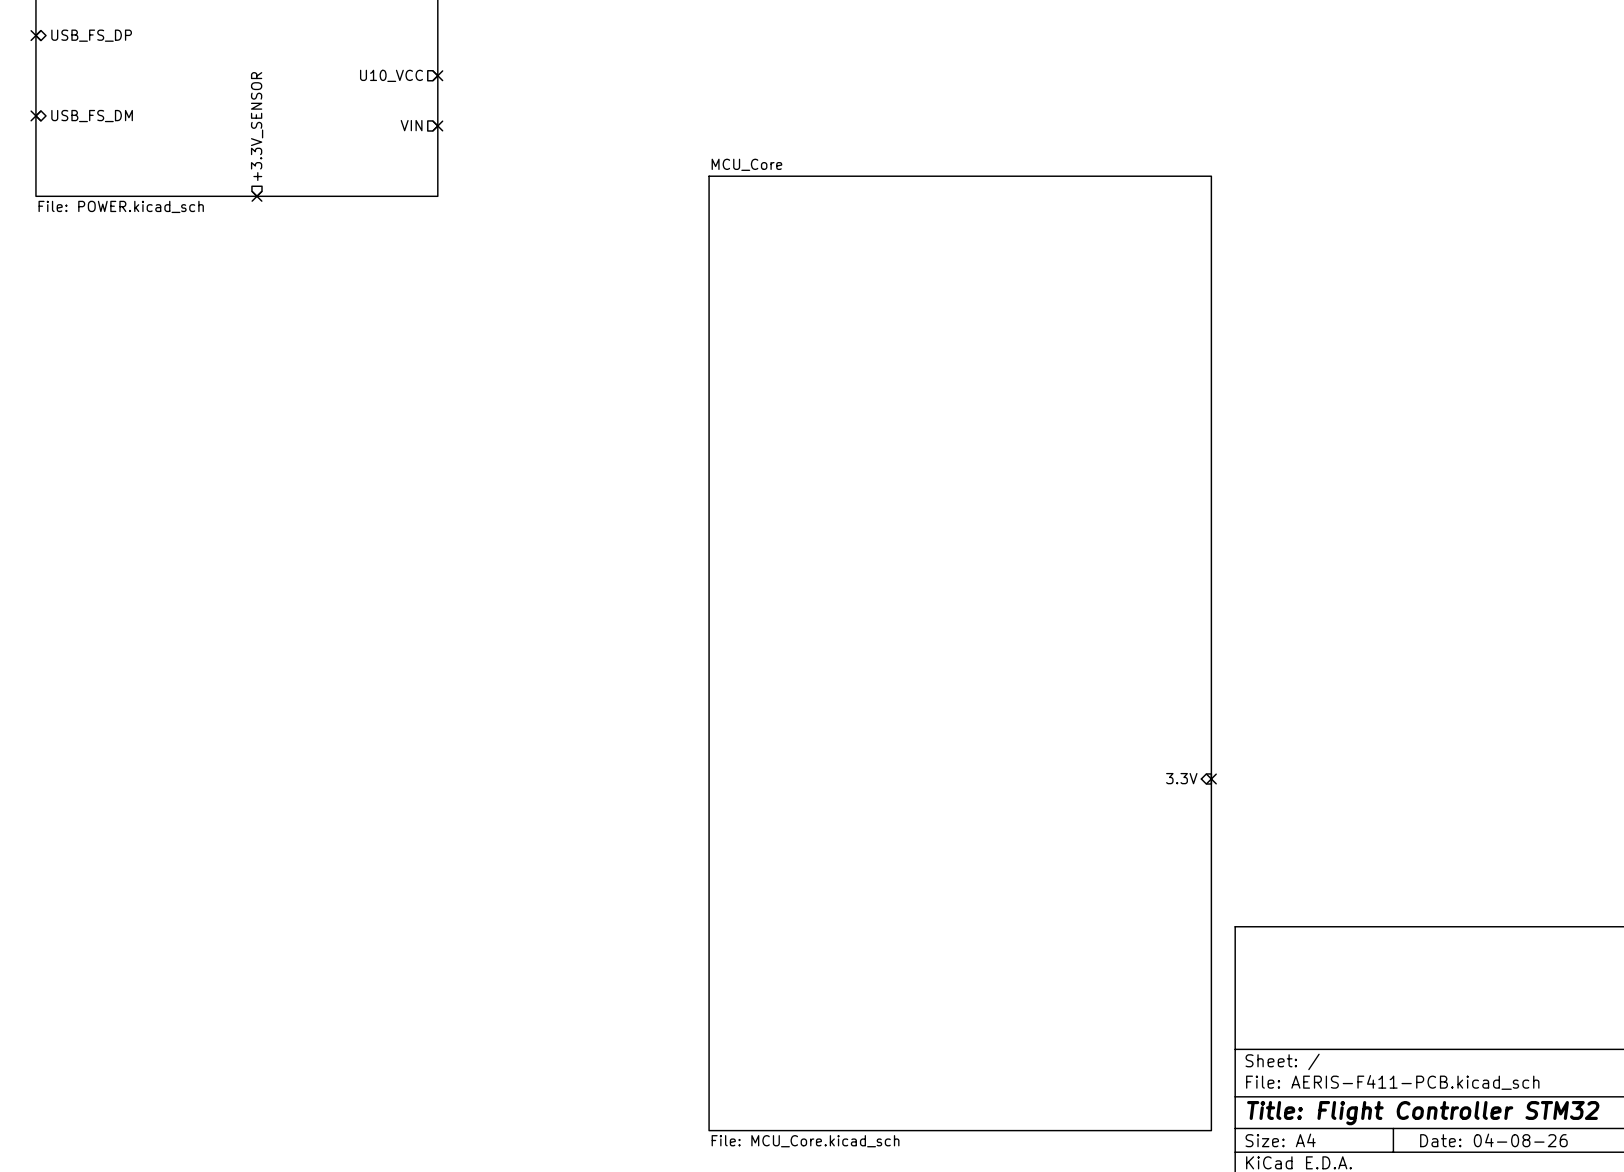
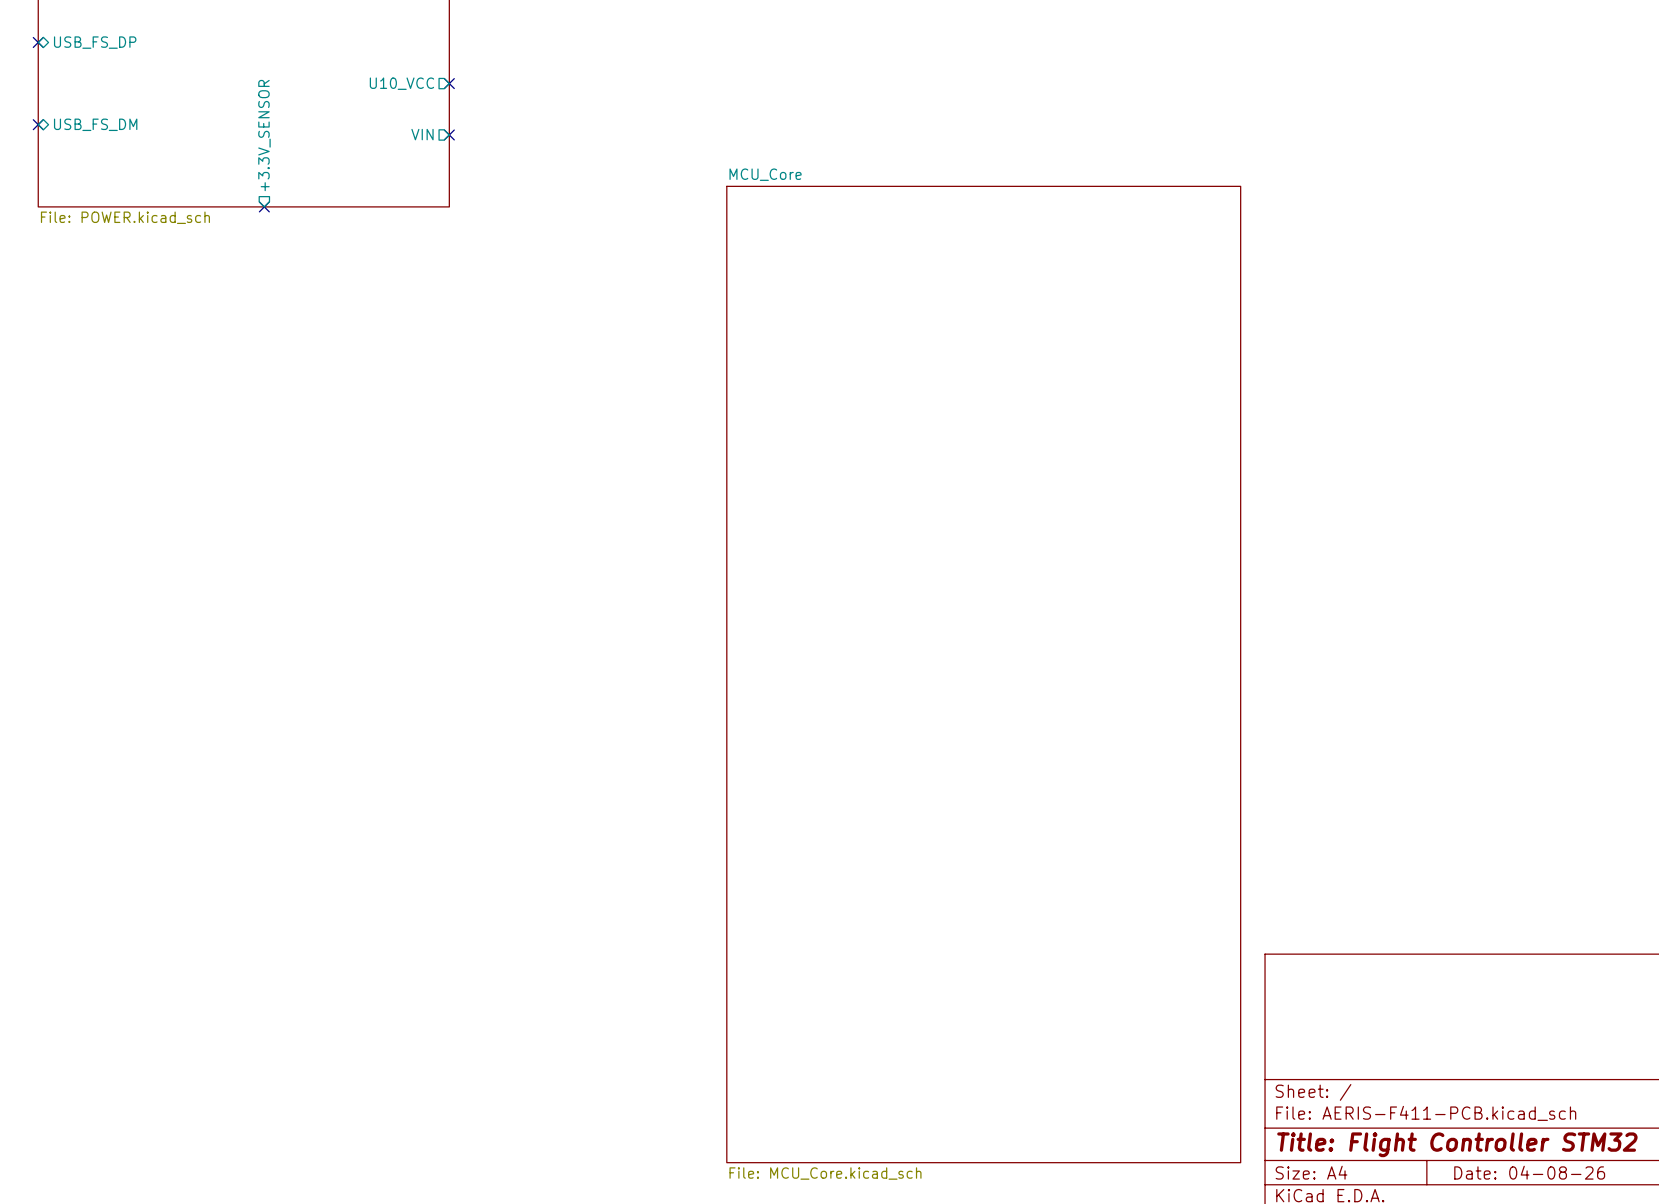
sheet pin: 3.3V (1181, 778) -> none
no-connect mark: (1211, 778) -> none

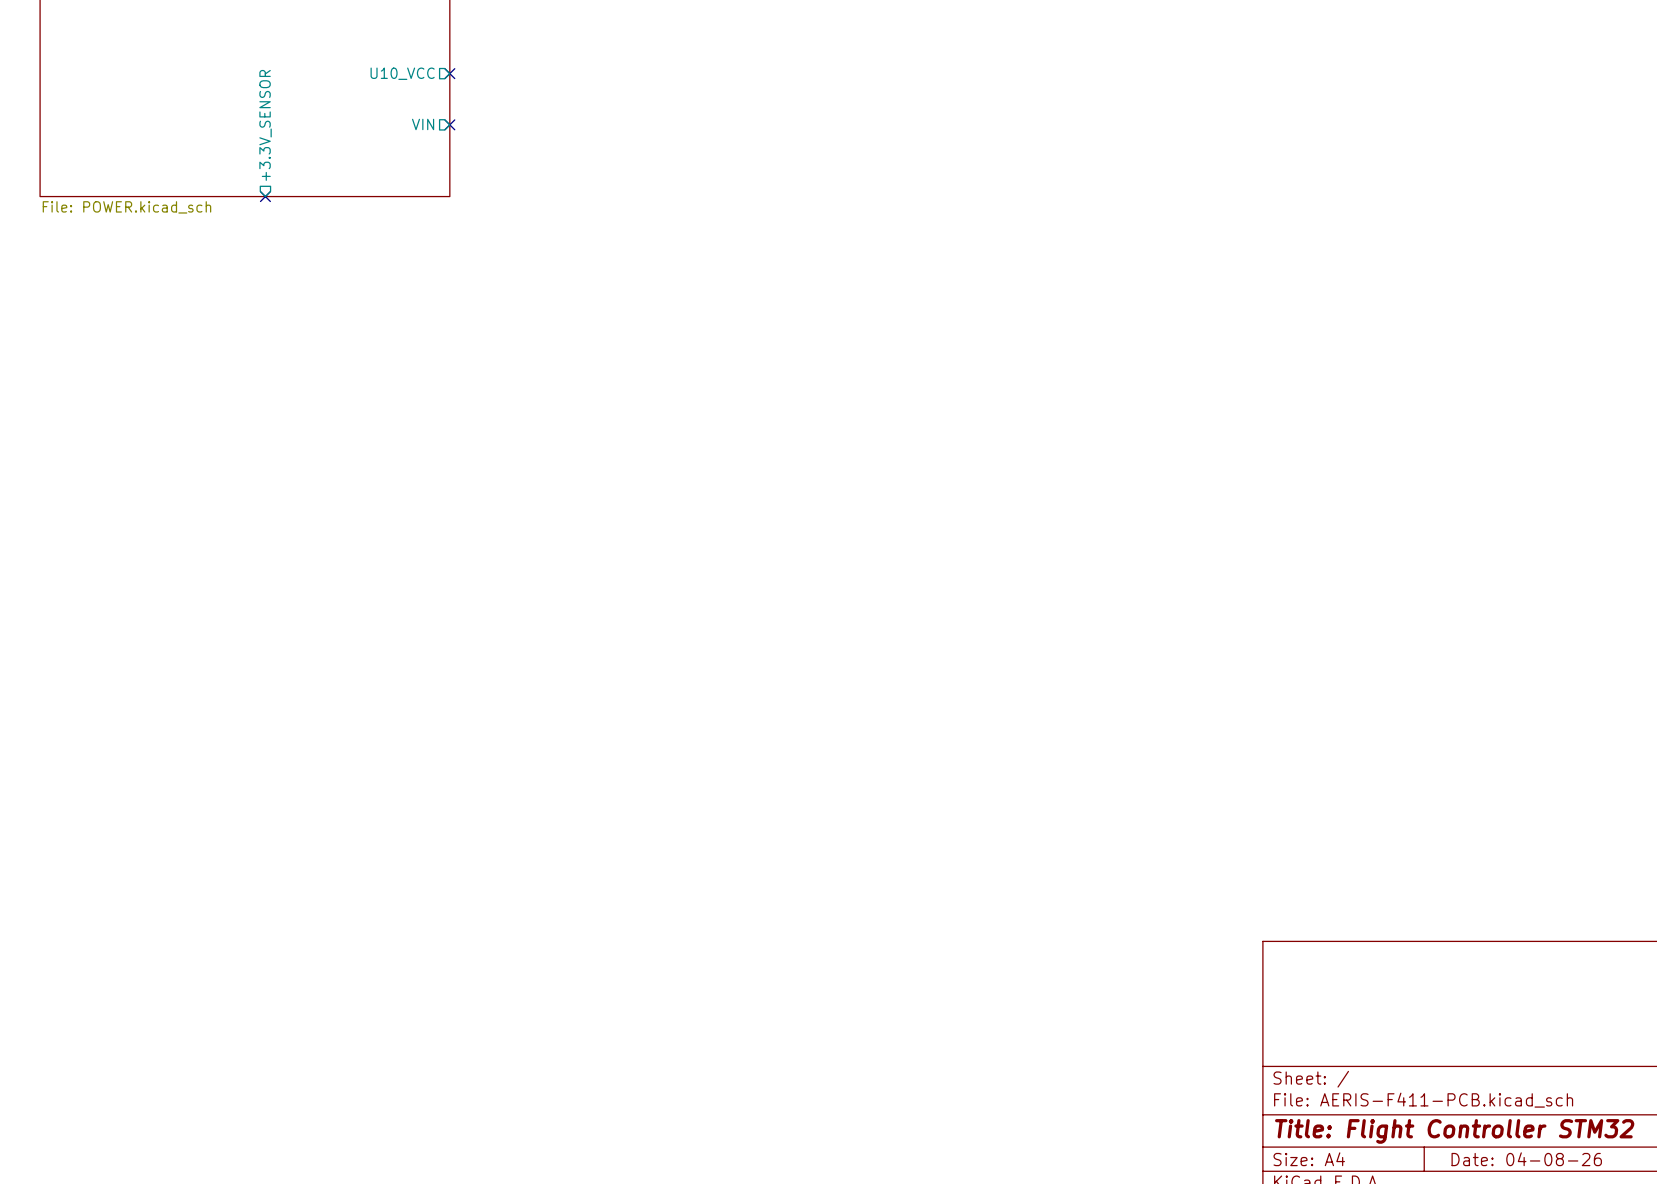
no-connect mark: (38, 42) -> none
sheet pin: USB_FS_DP (95, 42) -> none
no-connect mark: (38, 124) -> none
sheet pin: USB_FS_DM (95, 124) -> none
sheet MCU_Core: File: MCU_Core.kicad_sch (983, 674) -> none

